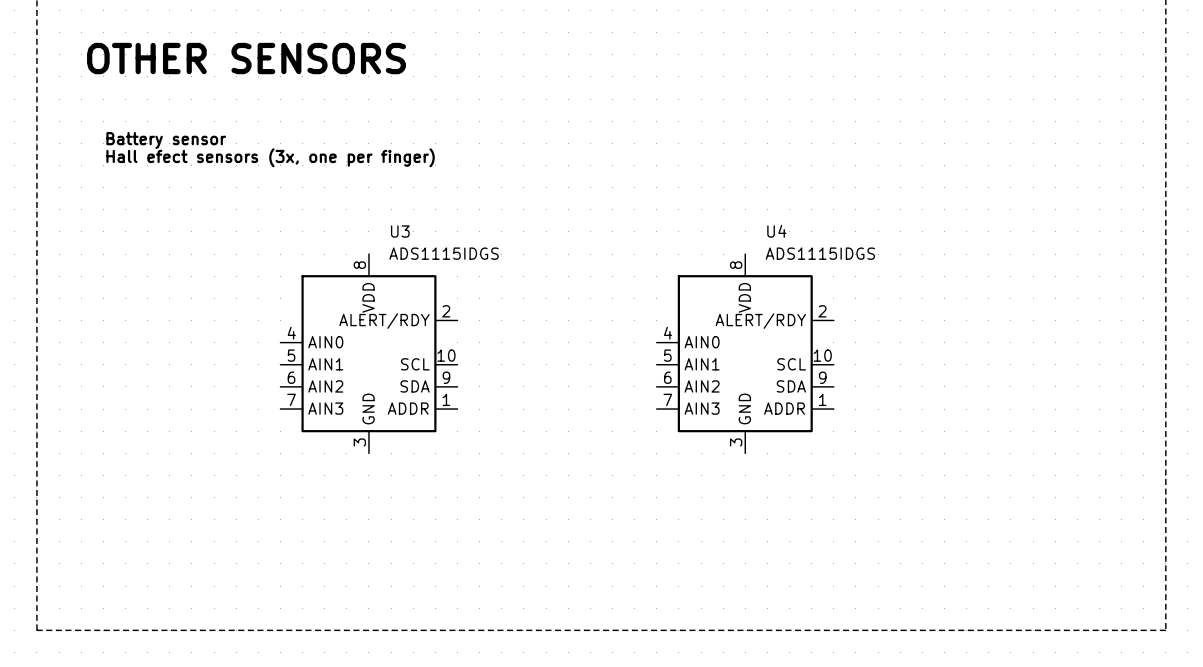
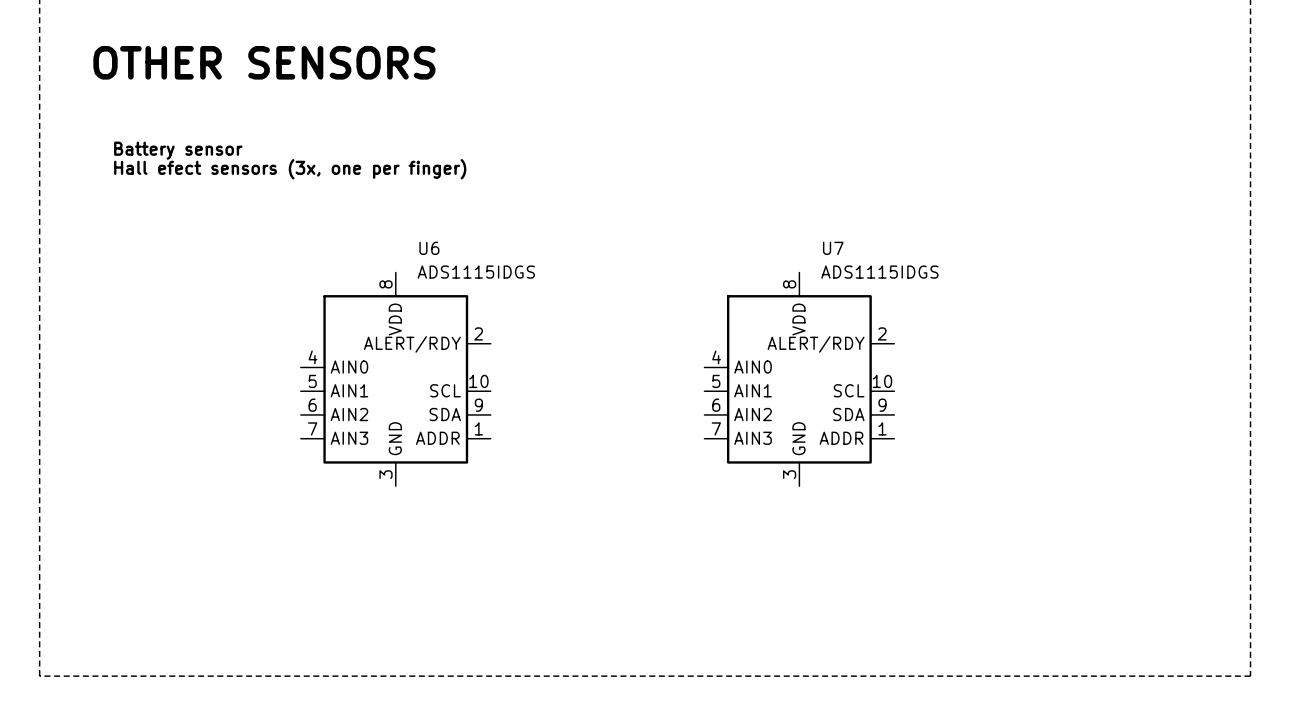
U3 name: U3 (400, 231) -> U6 (429, 248)
U4 name: U4 (776, 231) -> U7 (833, 248)

